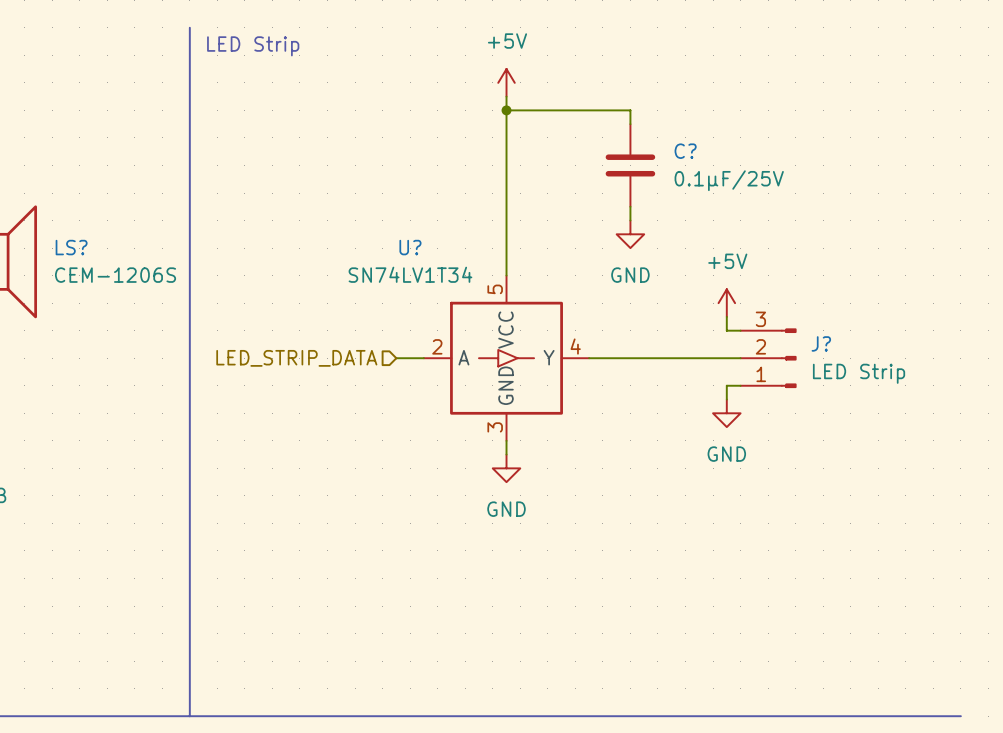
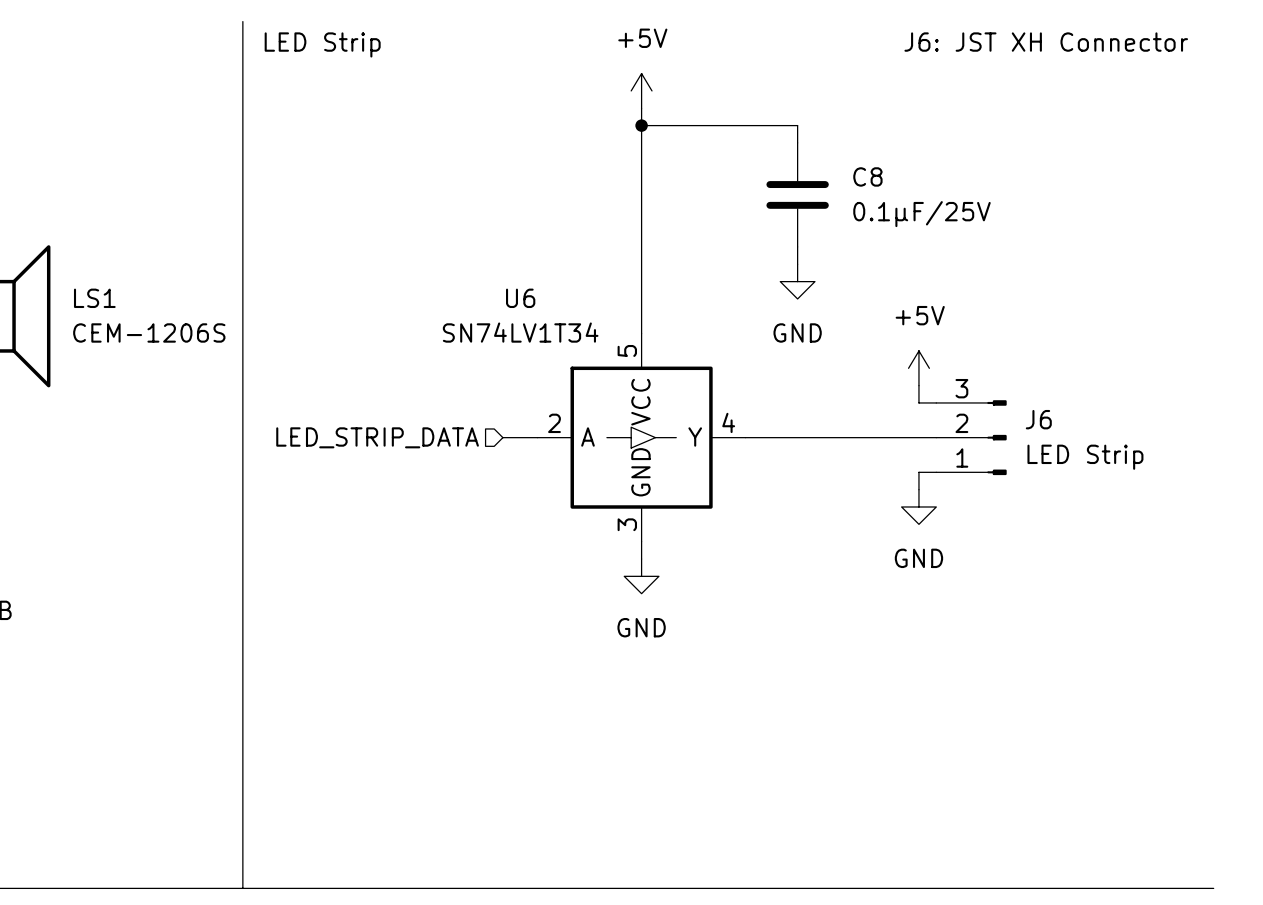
text: none -> J6: JST XH Connector (1046, 42)
C? name: C? (685, 151) -> C8 (867, 176)
LS? name: LS? (71, 247) -> LS1 (94, 298)
U? name: U? (410, 247) -> U6 (520, 298)
J? name: J? (821, 343) -> J6 (1038, 419)

